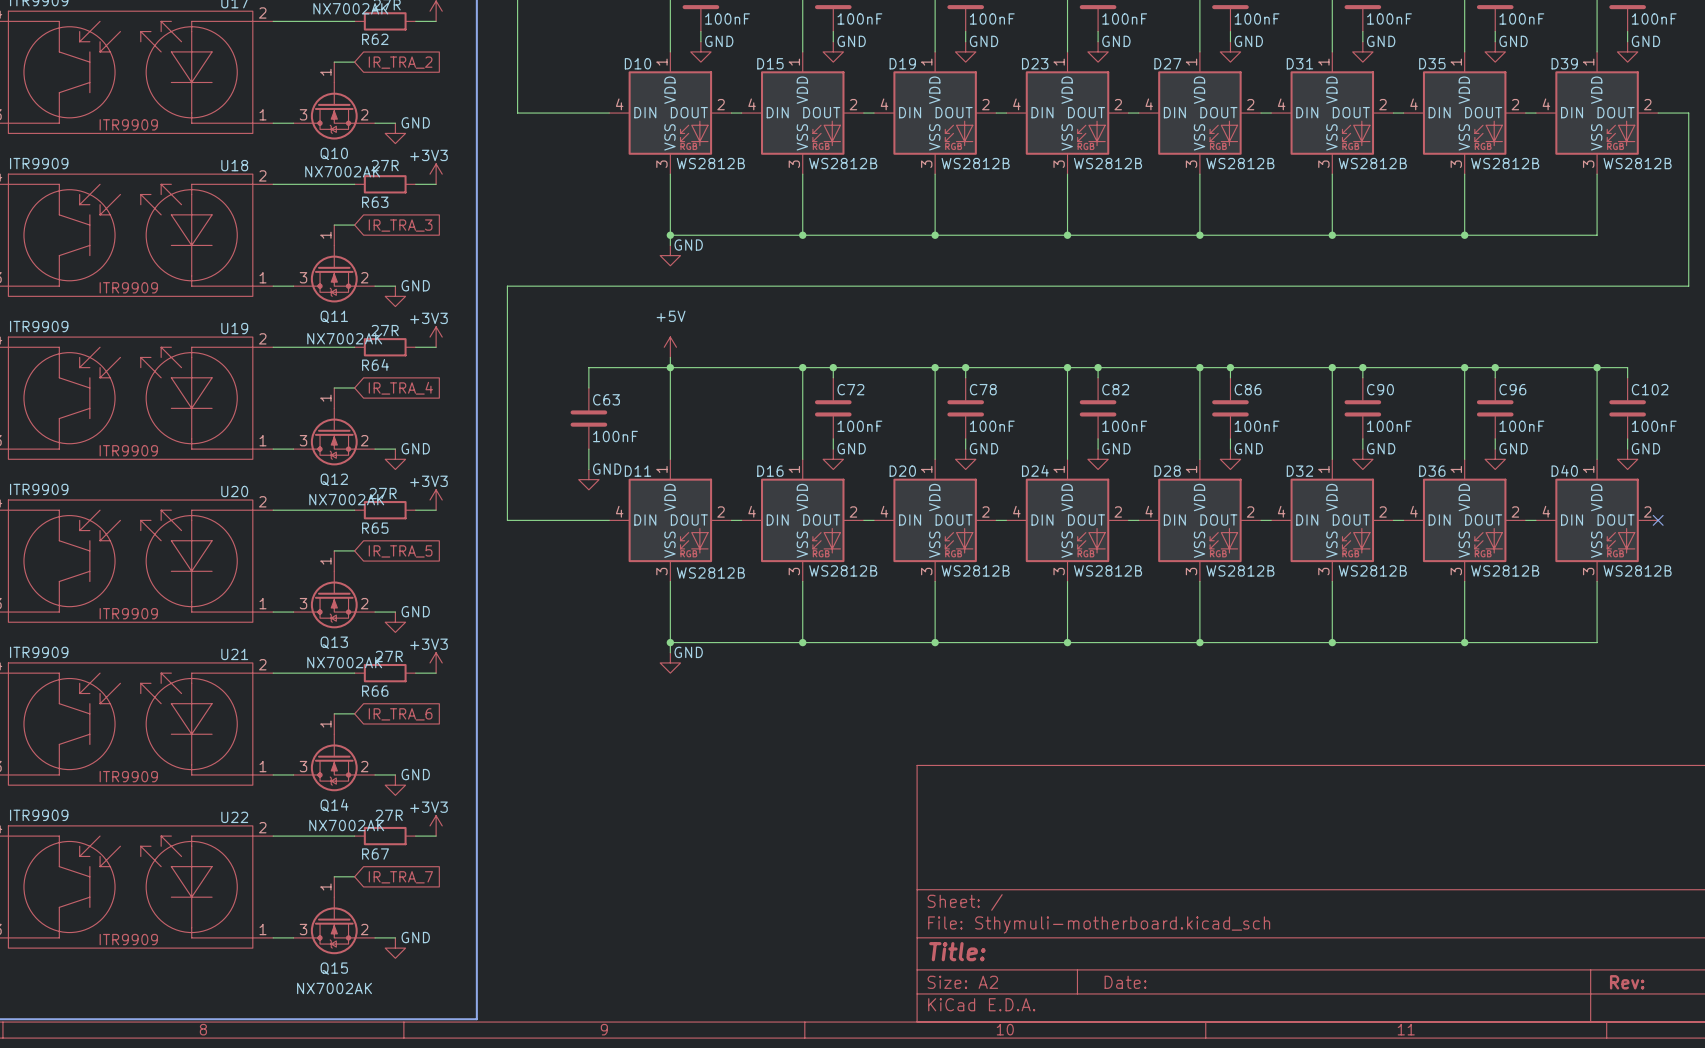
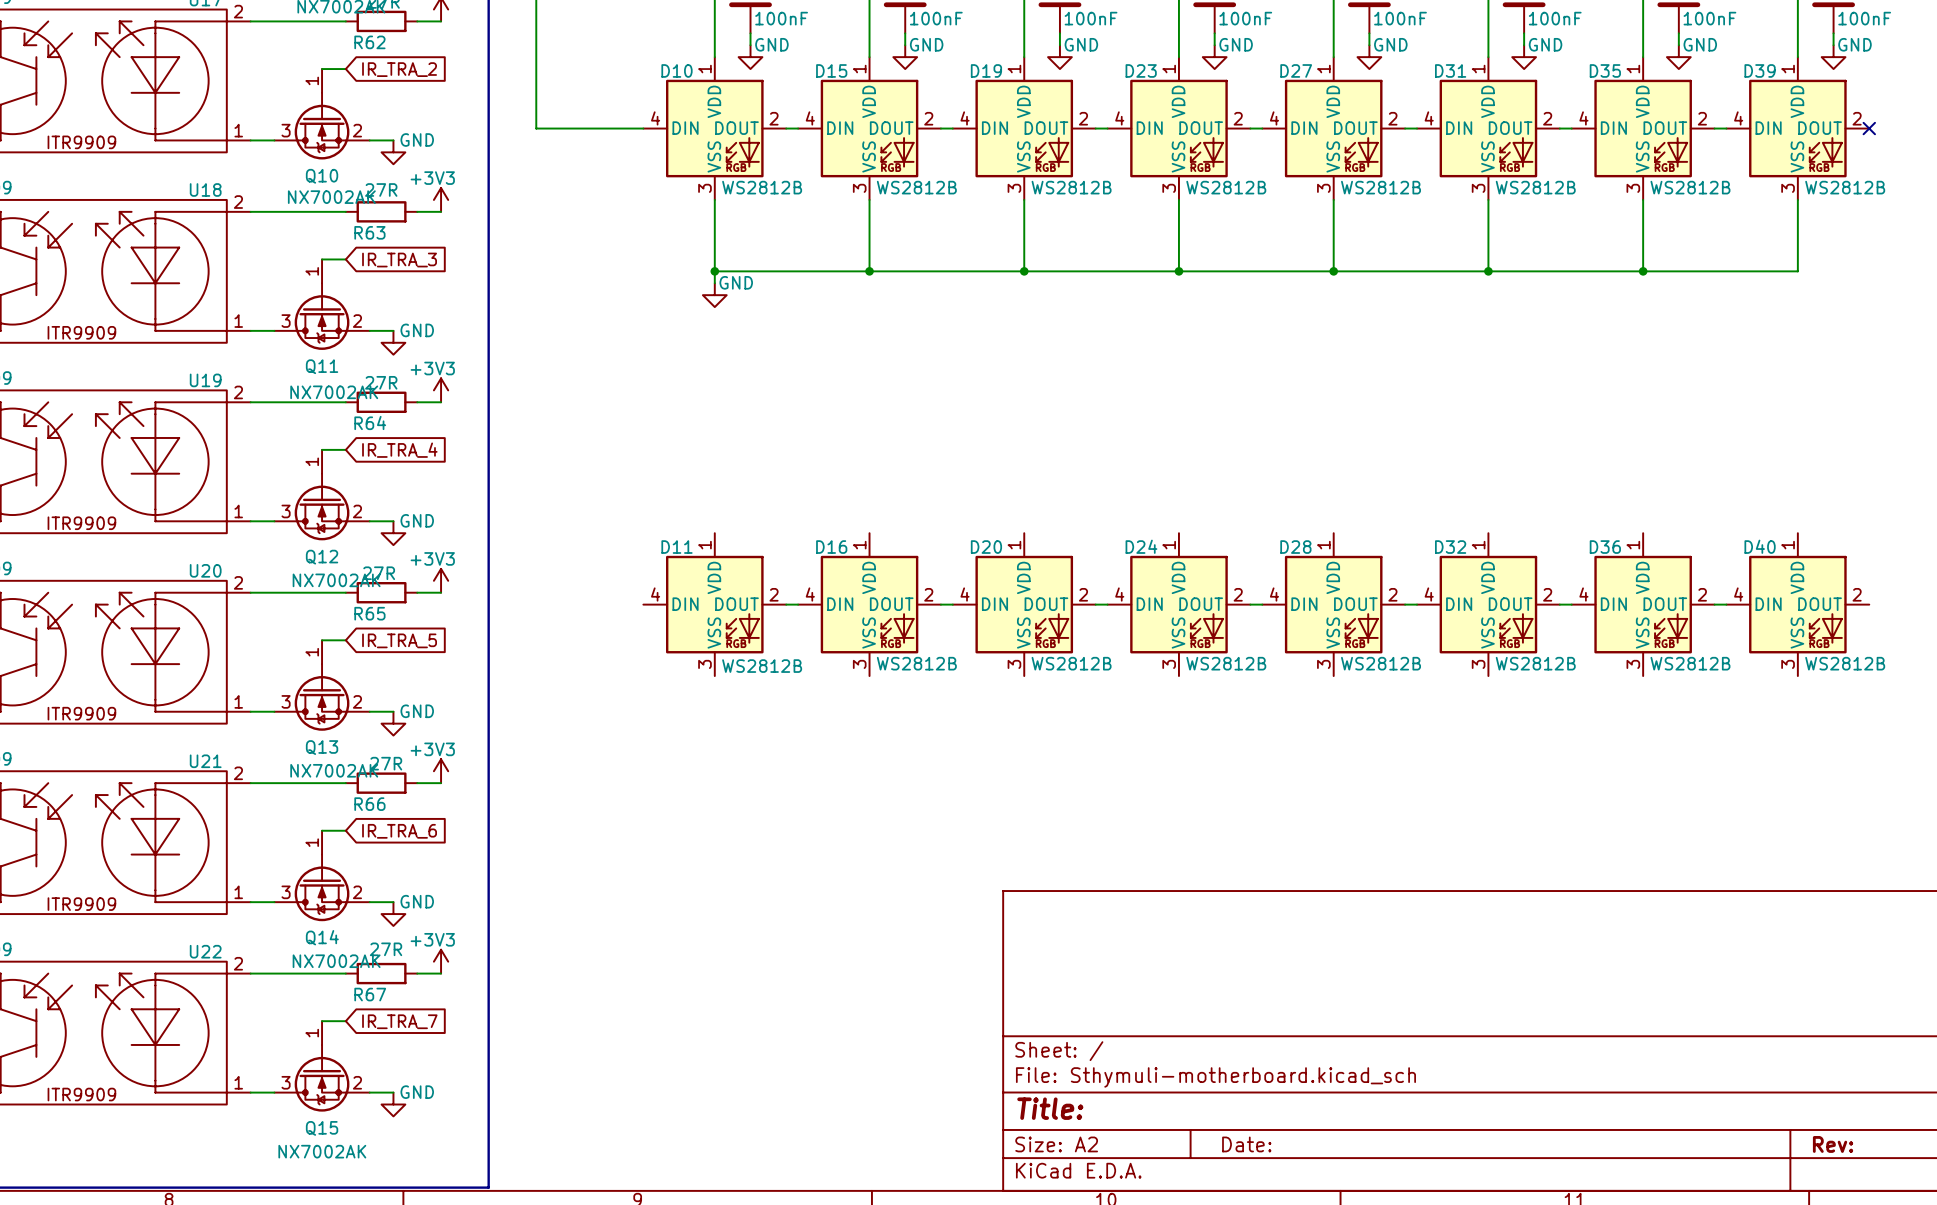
wire: (1658, 113) (1688, 113) (1688, 286) (507, 286) (507, 520) (609, 520) -> none
no-connect mark: none -> (1869, 128)
power symbol: +5V (670, 347) -> none
wire: (670, 357) (670, 459) -> none
junction: (670, 367) -> none
wire: (802, 367) (802, 459) -> none
junction: (802, 367) -> none
wire: (833, 367) (833, 377) -> none
junction: (833, 367) -> none
wire: (935, 367) (935, 459) -> none
junction: (935, 367) -> none
wire: (965, 367) (965, 377) -> none
junction: (965, 367) -> none
wire: (1067, 367) (1067, 459) -> none
junction: (1067, 367) -> none
wire: (1098, 367) (1098, 377) -> none
junction: (1098, 367) -> none
wire: (1199, 367) (1199, 459) -> none
junction: (1199, 367) -> none
wire: (1230, 367) (1230, 377) -> none
junction: (1230, 367) -> none
wire: (1332, 367) (1332, 459) -> none
junction: (1332, 367) -> none
wire: (1362, 367) (1362, 377) -> none
junction: (1362, 367) -> none
wire: (1464, 367) (1464, 459) -> none
junction: (1464, 367) -> none
wire: (1495, 367) (1495, 377) -> none
junction: (1495, 367) -> none
wire: (1597, 367) (1597, 459) -> none
junction: (1597, 367) -> none
wire: (1627, 377) (1627, 367) (588, 367) (588, 388) -> none
C72: 100nF (833, 408) -> none
C78: 100nF (965, 408) -> none
C82: 100nF (1098, 408) -> none
C86: 100nF (1230, 408) -> none
C90: 100nF (1362, 408) -> none
C96: 100nF (1495, 408) -> none
C102: 100nF (1627, 408) -> none
C63: 100nF (588, 418) -> none
wire: (833, 438) (833, 449) -> none
wire: (965, 438) (965, 449) -> none
wire: (1098, 438) (1098, 449) -> none
wire: (1230, 438) (1230, 449) -> none
wire: (1362, 438) (1362, 449) -> none
wire: (1495, 438) (1495, 449) -> none
wire: (1627, 438) (1627, 449) -> none
wire: (588, 449) (588, 469) -> none
power symbol: GND (833, 459) -> none
power symbol: GND (965, 459) -> none
power symbol: GND (1098, 459) -> none
power symbol: GND (1230, 459) -> none
power symbol: GND (1362, 459) -> none
power symbol: GND (1495, 459) -> none
power symbol: GND (1627, 459) -> none
power symbol: GND (588, 479) -> none
no-connect mark: (1658, 520) -> none
wire: (670, 581) (670, 652) -> none
wire: (802, 581) (802, 642) -> none
wire: (935, 581) (935, 642) -> none
wire: (1067, 581) (1067, 642) -> none
wire: (1199, 581) (1199, 642) -> none
wire: (1332, 581) (1332, 642) -> none
wire: (1464, 581) (1464, 642) -> none
wire: (1597, 581) (1597, 642) (670, 642) -> none
junction: (670, 642) -> none
junction: (802, 642) -> none
junction: (935, 642) -> none
junction: (1067, 642) -> none
junction: (1199, 642) -> none
junction: (1332, 642) -> none
junction: (1464, 642) -> none
power symbol: GND (670, 662) -> none

